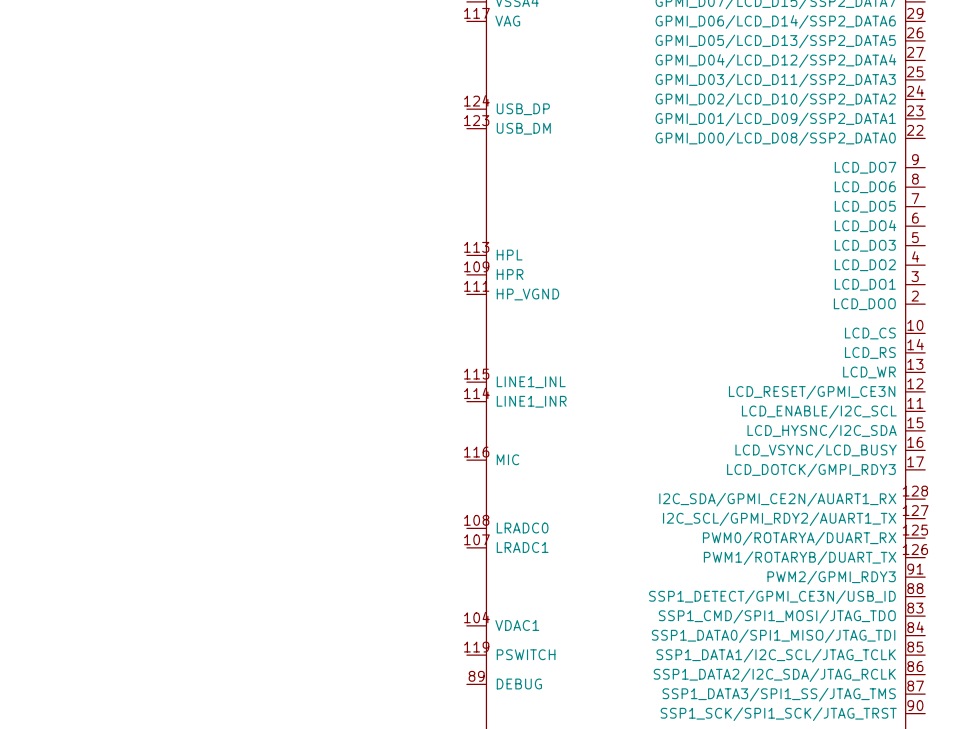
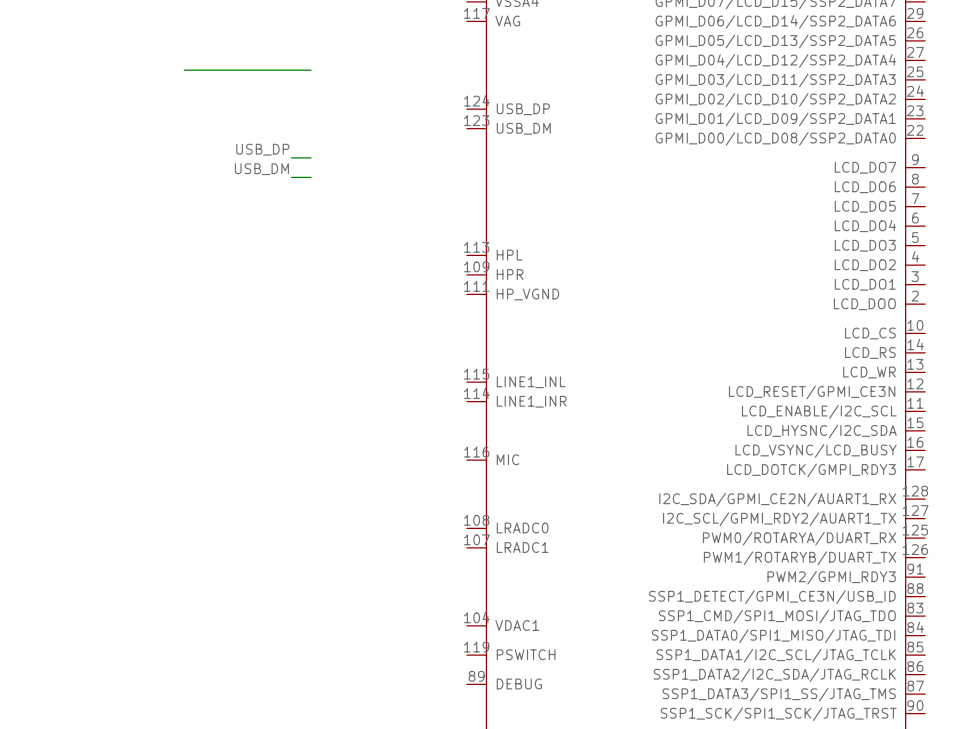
wire: none -> (184, 70) (310, 70)
label: none -> USB_DP (262, 149)
wire: none -> (291, 157) (310, 157)
label: none -> USB_DM (261, 169)
wire: none -> (291, 177) (310, 177)

